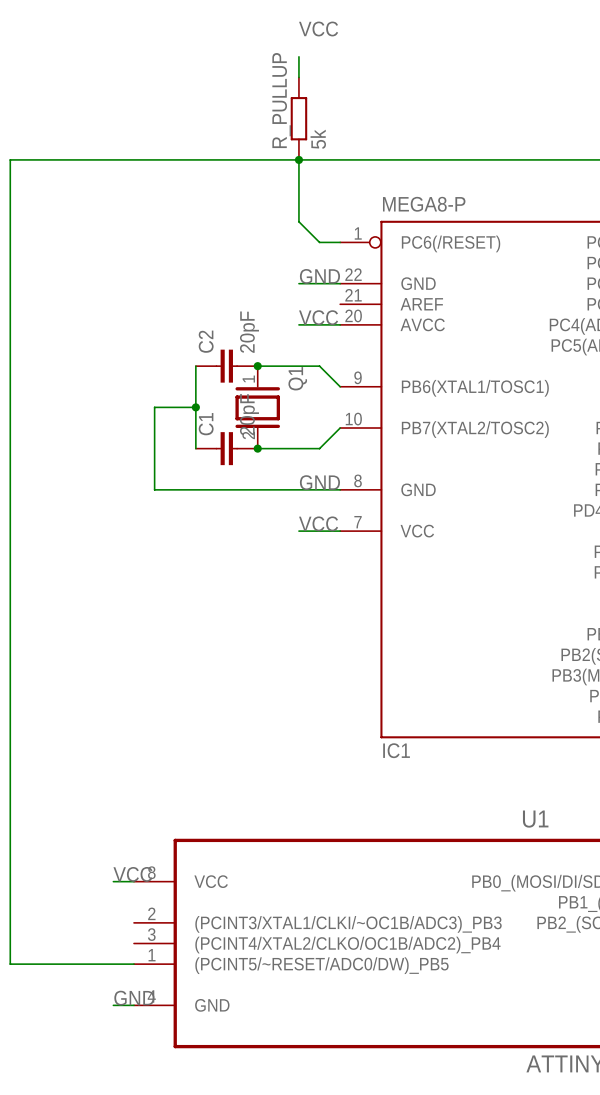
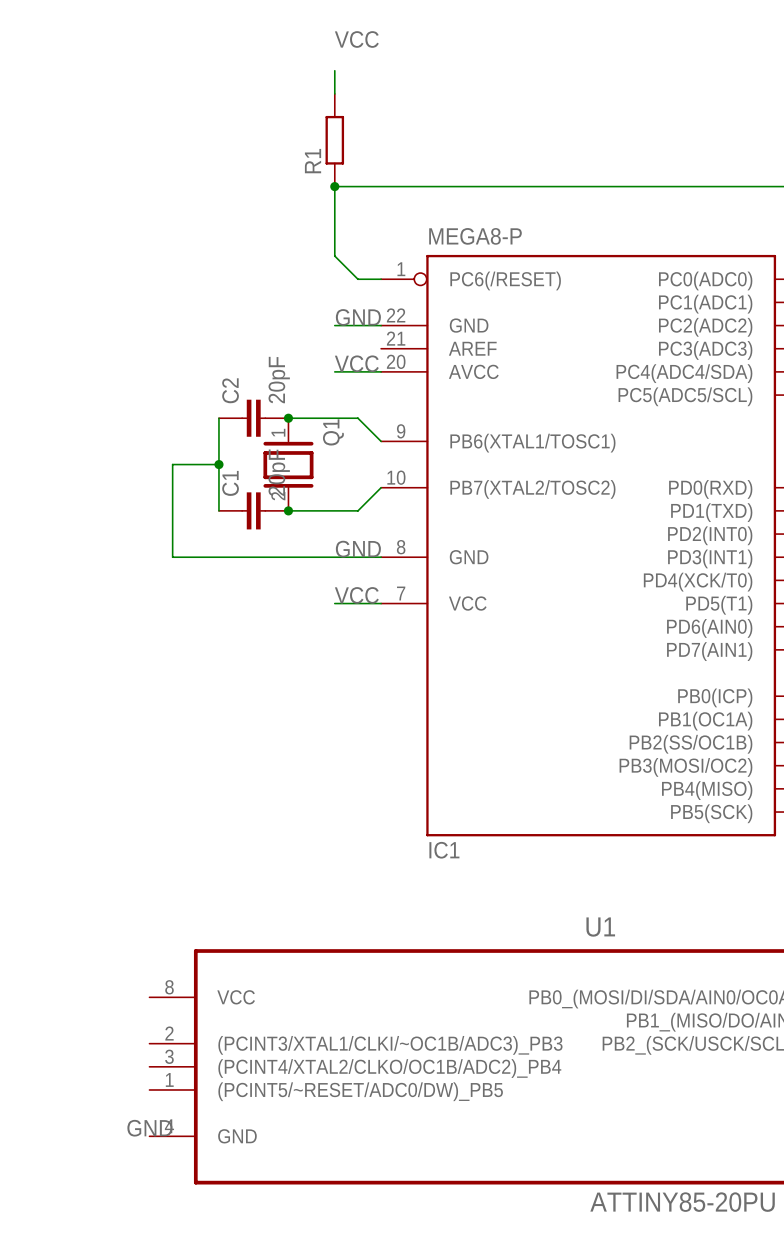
R_PULLUP name: R_PULLUP (281, 100) -> R1 (313, 161)
R_PULLUP value: 5k (318, 139) -> none
wire: (298, 159) (10, 159) (10, 964) (134, 964) -> none
label: VCC (132, 874) -> none
wire: (113, 881) (134, 881) -> none
wire: (113, 1005) (134, 1005) -> none

